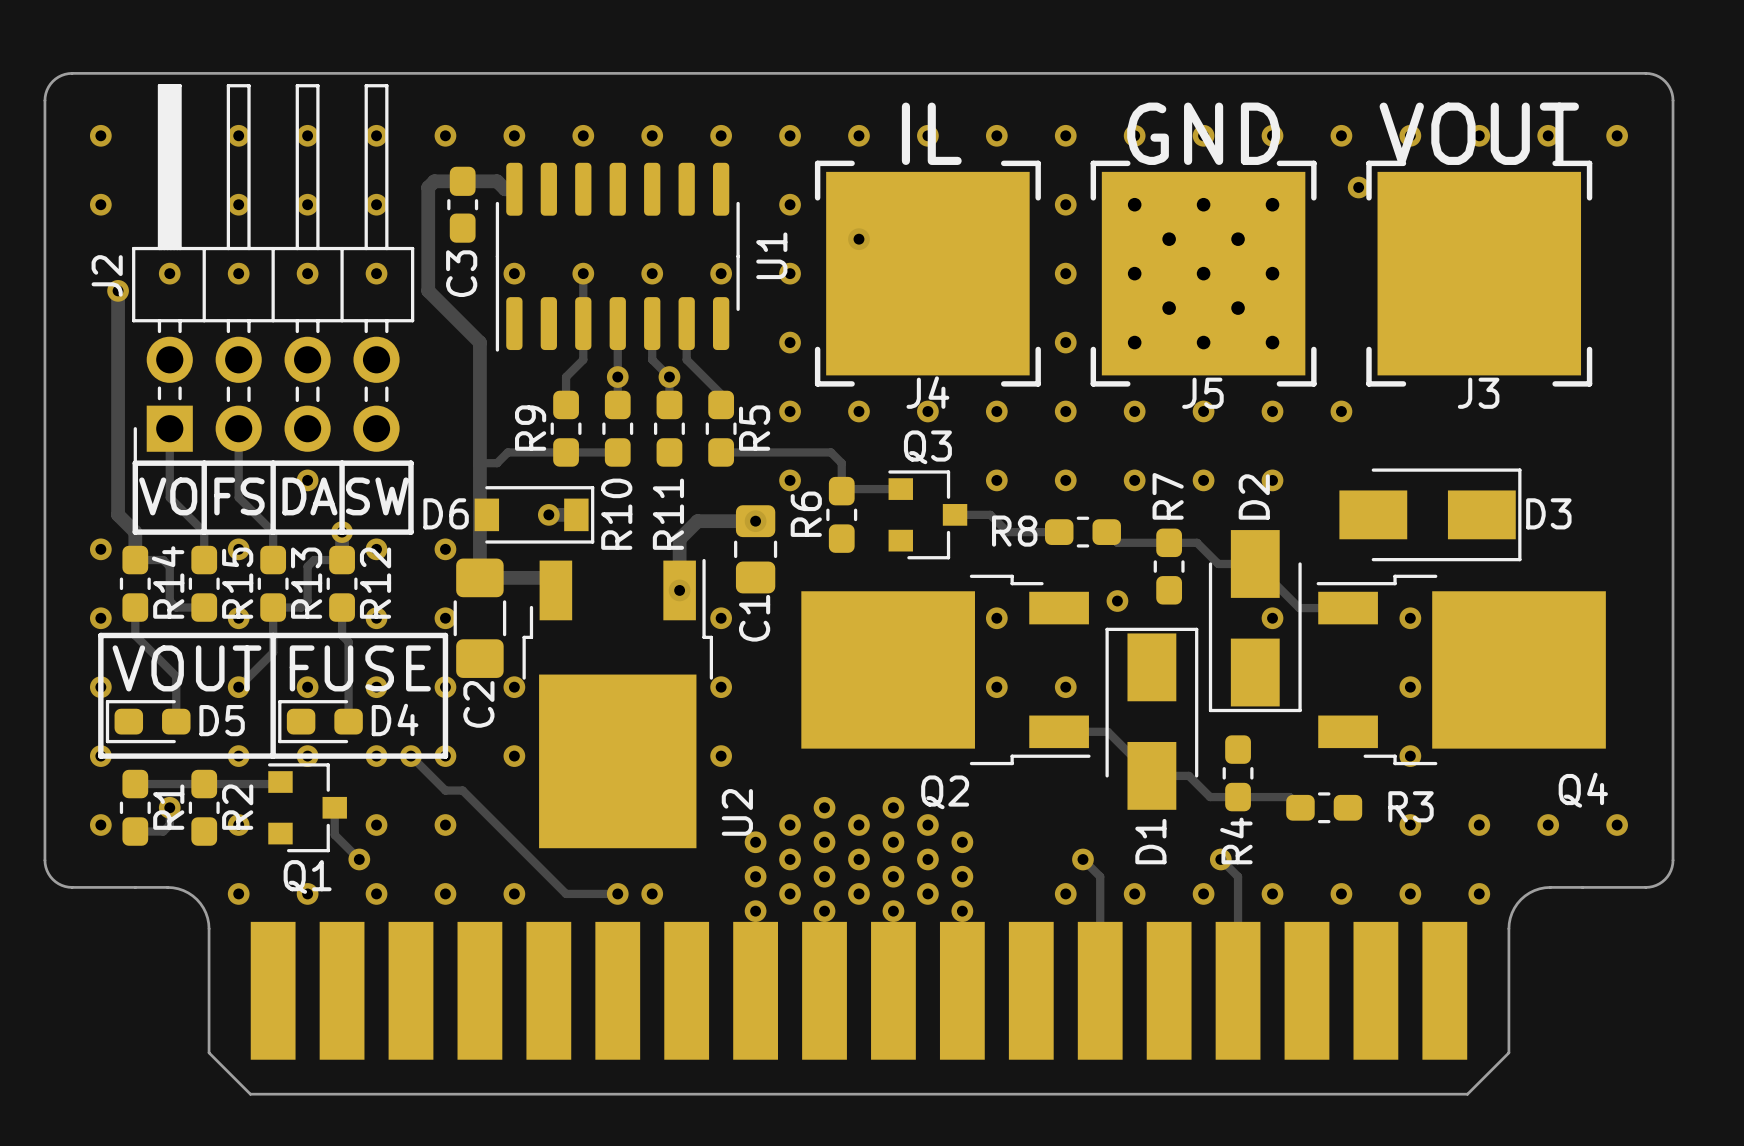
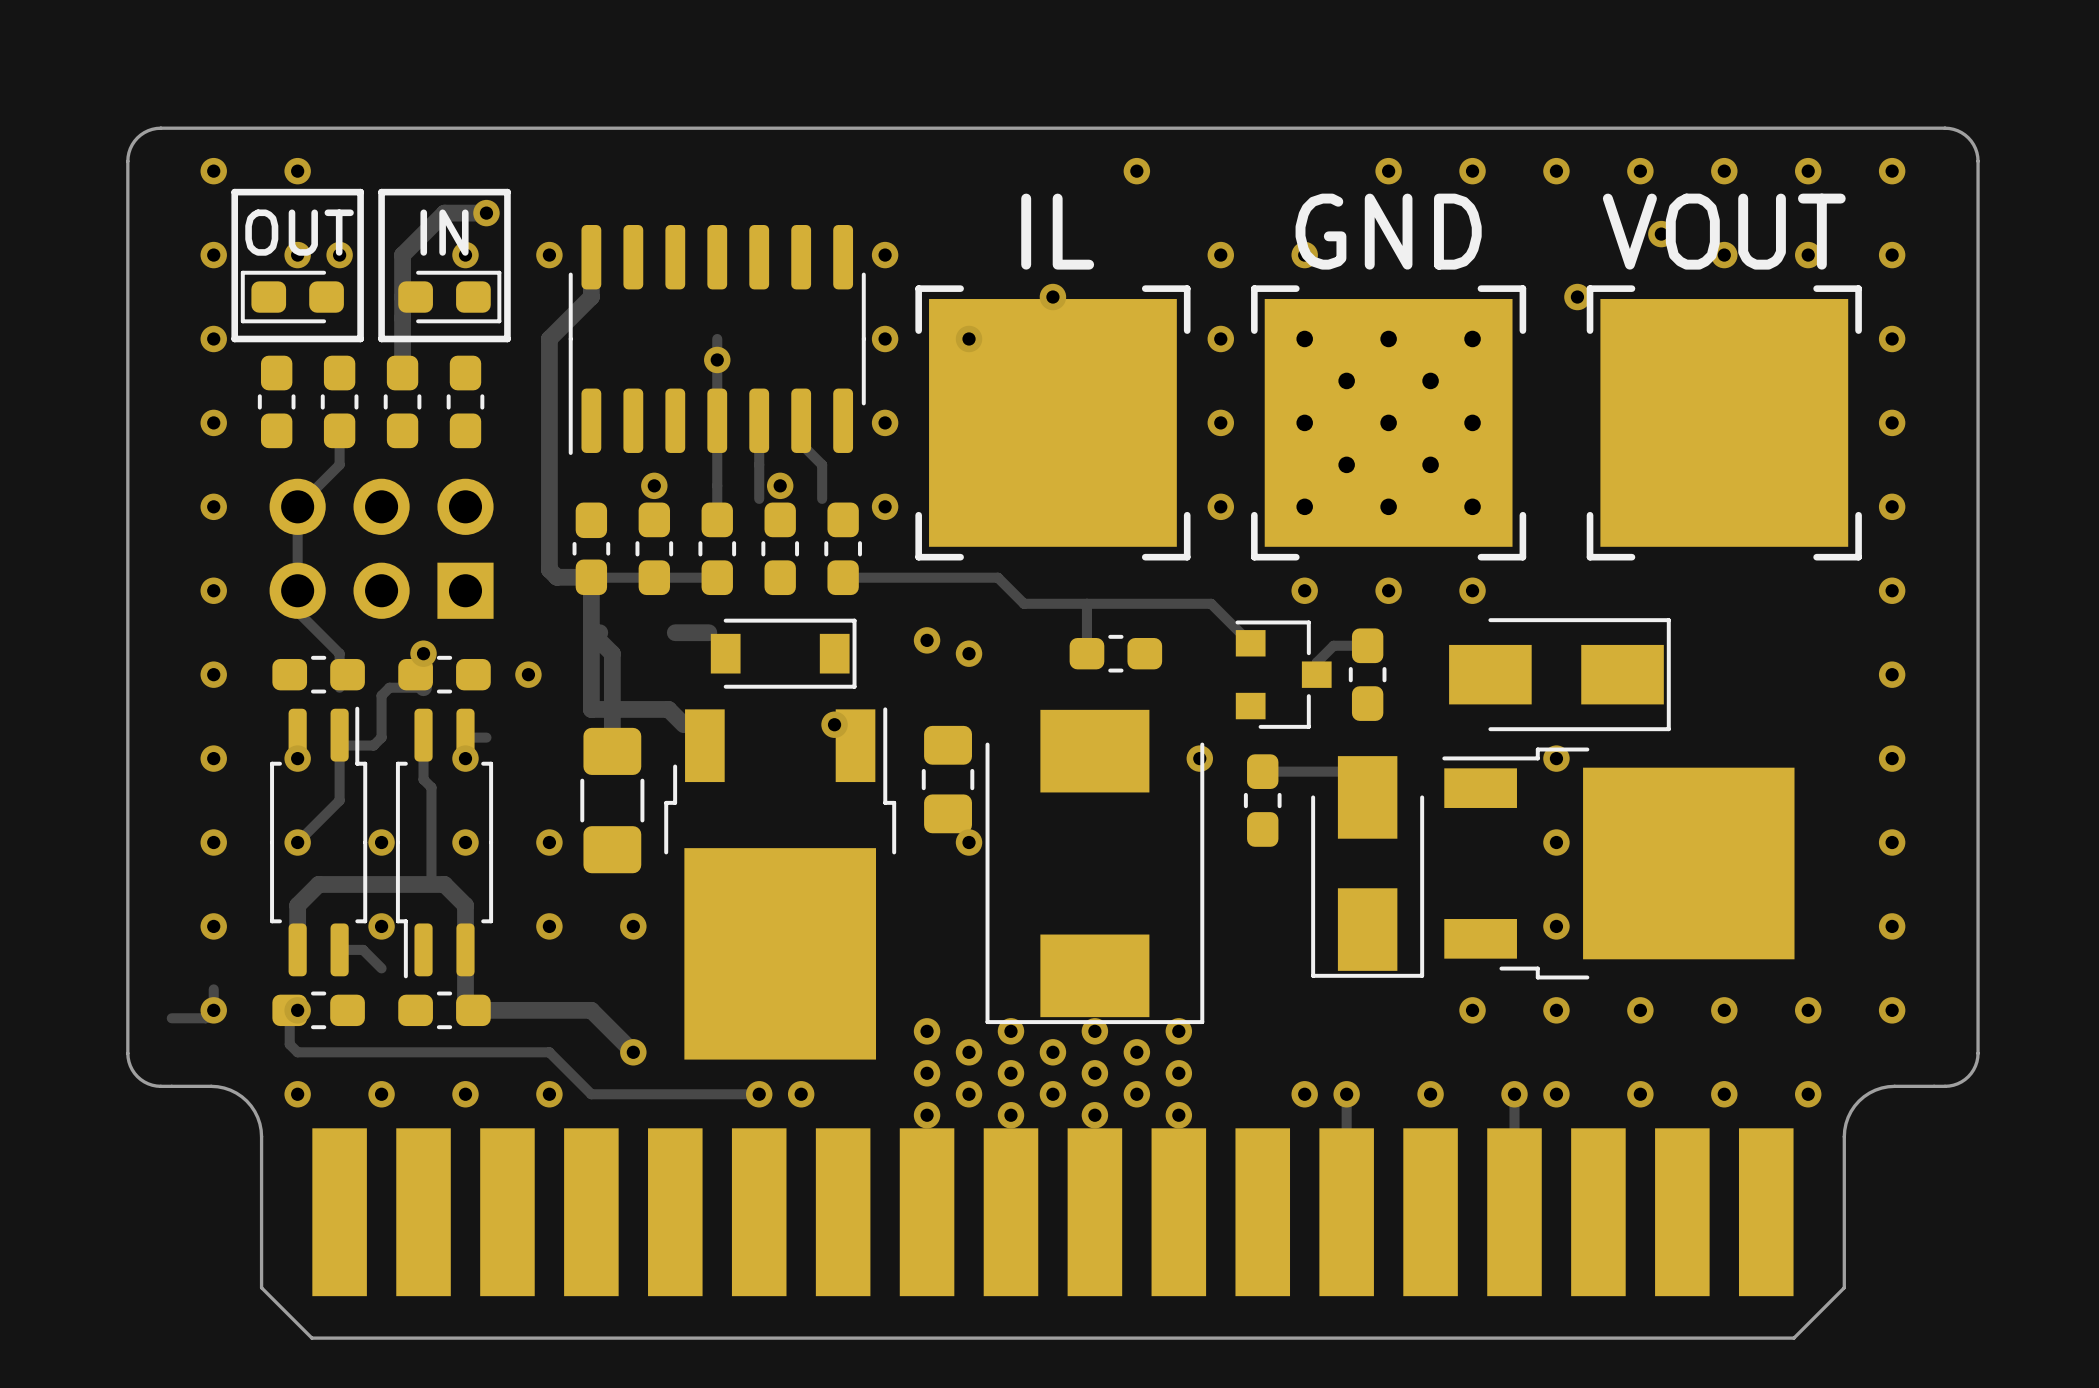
via: (100, 135) -> none
via: (307, 135) -> none
via: (376, 135) -> none
via: (445, 135) -> none
via: (514, 135) -> none
via: (583, 135) -> none
via: (652, 135) -> none
via: (721, 135) -> none
via: (790, 135) -> none
via: (858, 135) -> none
via: (996, 135) -> none
via: (1065, 135) -> none
via: (1617, 135) -> none
line: none -> (234, 192) (360, 192) (360, 338) (234, 338) (234, 192)
line: none -> (381, 192) (381, 338) (507, 338) (507, 192) (381, 192)
track: none -> (486, 213) (444, 213) (402, 255) (402, 373)
via: none -> (486, 213)
text: none -> OUT (299, 232)
text: none -> IN (444, 232)
track: (514, 189) (505, 189) (497, 181) (434, 181) (428, 187) (428, 290) (479, 342) (479, 469) -> (591, 257) (591, 297) (549, 338) (549, 569) (556, 577) (591, 577)
via: (100, 204) -> none
via position: (307, 204) -> (339, 255)
via: none -> (549, 255)
C3: (462, 204) -> none
via: none -> (885, 255)
via: (790, 204) -> none
via: none -> (1220, 255)
via: none -> (1724, 255)
via: none -> (1808, 255)
via: none -> (1892, 255)
part: none -> (292, 297)
part: none -> (449, 297)
via: none -> (1577, 297)
U1: (617, 257) -> none
via: (238, 273) -> none
via: (307, 273) -> none
via: (376, 273) -> none
via: (514, 273) -> none
via position: (583, 273) -> (717, 359)
via: (652, 273) -> none
J4: (927, 273) -> none
via: none -> (1220, 338)
via: (1065, 273) -> none
J5: (1203, 273) -> none
J3: (1479, 273) -> none
via: none -> (1892, 338)
J2: (273, 274) -> none
part: none -> (717, 339)
track: (118, 290) (118, 514) (135, 532) (135, 560) (163, 560) (169, 566) (169, 601) (176, 607) (204, 607) -> none
via: (118, 290) -> none
track: (686, 323) (686, 359) (721, 394) (721, 404) -> none
part: none -> (276, 401)
part: none -> (339, 401)
part: none -> (402, 401)
part: none -> (465, 401)
via: none -> (213, 422)
via: none -> (885, 422)
via: (790, 342) -> none
part: none -> (1052, 422)
via: none -> (1220, 422)
via: (1065, 342) -> none
part: none -> (1388, 422)
part: none -> (1724, 422)
via: none -> (1892, 422)
track: none -> (339, 430) (339, 464) (297, 506)
track: (583, 359) (566, 377) (566, 404) -> (717, 443) (717, 519)
via position: (617, 377) -> (780, 485)
via: (669, 377) -> none
via: none -> (654, 485)
via: none -> (213, 506)
via: none -> (885, 506)
via: (790, 411) -> none
via: (858, 411) -> none
via: (927, 411) -> none
via: (1065, 411) -> none
via: (1134, 411) -> none
via: (1203, 411) -> none
via: (1272, 411) -> none
via: (1341, 411) -> none
via: none -> (1892, 506)
track: (169, 428) (169, 497) (204, 532) (204, 560) -> none
R9: (566, 428) -> none
R10: (617, 428) -> none
R11: (669, 428) -> none
R5: (721, 428) -> none
part: none -> (381, 548)
part: none -> (591, 548)
part: none -> (654, 548)
part: none -> (717, 548)
part: none -> (780, 548)
part: none -> (843, 548)
track: (617, 452) (507, 452) (497, 463) (479, 463) -> none
track: (721, 452) (831, 452) (841, 463) (841, 491) (843, 489) (900, 489) -> none
line: (135, 463) (135, 532) (410, 532) (410, 463) (135, 463) -> none
line: (204, 463) (204, 532) -> none
line: (273, 463) (273, 532) -> none
line: (342, 463) (342, 532) -> none
track: none -> (717, 577) (604, 577) (591, 590)
track: none -> (843, 577) (997, 577) (1024, 603) (1211, 603) (1250, 643)
via: none -> (213, 590)
via: (307, 480) -> none
via: (790, 480) -> none
via: (996, 480) -> none
via: (1272, 480) -> none
via: none -> (1892, 590)
track: none -> (1086, 603) (1086, 653)
text: VO (168, 496) -> none
text: FS (239, 496) -> none
text: DA (309, 496) -> none
text: SW (377, 496) -> none
track: none -> (591, 632) (612, 653) (612, 751)
D6: (534, 514) -> none
via: (548, 514) -> none
R6: (841, 514) -> none
Q3: (927, 514) -> none
track: (955, 514) (990, 514) (1007, 532) (1059, 532) -> none
D3: (1430, 514) -> none
track: (755, 521) (697, 521) (679, 539) (679, 590) -> none
track: none -> (1367, 645) (1333, 645) (1316, 662) (1316, 674)
part: none -> (783, 653)
via: none -> (969, 653)
part: none -> (1115, 653)
R8: (1082, 532) -> none
track: (1106, 532) (1117, 542) (1197, 542) (1218, 563) (1255, 563) (1299, 608) (1348, 608) -> none
via: (100, 549) -> none
via: none -> (213, 674)
via: (238, 549) -> none
part: none -> (318, 674)
part: none -> (444, 674)
via: (376, 549) -> none
via position: (445, 549) -> (528, 674)
C1: (755, 549) -> none
part: none -> (1283, 674)
part: none -> (1367, 674)
part: none -> (1559, 674)
via: none -> (1892, 674)
R7: (1169, 566) -> none
R14: (135, 583) -> none
R15: (204, 583) -> none
R13: (273, 583) -> none
R12: (342, 583) -> none
track: none -> (465, 735) (467, 737) (486, 737)
via: (1117, 601) -> none
track: (135, 607) (135, 635) (176, 676) (176, 721) -> none
via: (100, 618) -> none
via: none -> (213, 758)
via: (445, 618) -> none
C2: (479, 618) -> none
via: (721, 618) -> none
via position: (996, 618) -> (1199, 758)
via: (1410, 618) -> none
via: none -> (1892, 758)
D2: (1255, 621) -> none
track: none -> (1262, 771) (1341, 771) (1367, 797)
line: (100, 635) (100, 756) (445, 756) (445, 635) (100, 635) -> none
line: (273, 635) (273, 756) -> none
part: none -> (948, 779)
part: none -> (612, 800)
part: none -> (1262, 800)
text: VOUT (187, 668) -> none
text: FUSE (360, 668) -> none
Q2: (945, 669) -> none
Q4: (1461, 669) -> none
part: none -> (318, 841)
via: (100, 687) -> none
via: none -> (213, 842)
part: none -> (444, 843)
via: (514, 687) -> none
via: (721, 687) -> none
via: none -> (969, 842)
via: (996, 687) -> none
via: (1065, 687) -> none
via: none -> (1556, 842)
via: (1410, 687) -> none
via: none -> (1892, 842)
U2 position: (617, 703) -> (780, 883)
part: none -> (1618, 863)
part: none -> (1094, 866)
part: none -> (1367, 866)
D1: (1151, 718) -> none
D5: (148, 721) -> none
D4: (320, 721) -> none
track: (1059, 731) (1107, 731) (1151, 775) (1188, 775) (1210, 797) (1289, 797) (1300, 807) -> none
via: (100, 756) -> none
via: none -> (213, 926)
via: (238, 756) -> none
via: (376, 756) -> none
track: (410, 756) (445, 790) (462, 790) (566, 893) -> (289, 1010) (289, 1044) (297, 1052) (549, 1052) (591, 1094) (696, 1094)
via: (410, 756) -> none
via: (721, 756) -> none
via: none -> (1556, 926)
via: (1410, 756) -> none
via: none -> (1892, 926)
R4: (1238, 773) -> none
track: none -> (297, 949) (297, 905) (318, 884) (444, 884) (465, 905) (465, 1002) (473, 1010) (591, 1010) (633, 1052)
track: none -> (339, 949) (363, 949) (381, 968)
track: (280, 782) (278, 784) (135, 784) -> none
R1: (135, 807) -> none
via position: (169, 807) -> (213, 1010)
R2: (204, 807) -> none
Q1: (307, 807) -> none
track: (334, 807) (334, 834) (359, 859) -> none
via: (824, 807) -> none
via: (893, 807) -> none
R3: (1324, 807) -> none
U2 name: U2 (737, 812) -> none
via: (100, 825) -> none
part: none -> (318, 1010)
part: none -> (444, 1010)
via: (376, 825) -> none
via: (445, 825) -> none
via: (790, 825) -> none
via: (858, 825) -> none
via: (927, 825) -> none
via: none -> (1472, 1010)
via: none -> (1556, 1010)
via: none -> (1640, 1010)
via: (1617, 825) -> none
via: (359, 859) -> none
track: (1082, 859) (1100, 876) (1100, 893) -> none
via: (1082, 859) -> none
track: (1220, 859) (1238, 876) (1238, 893) -> none
via: (1220, 859) -> none
board edge: (126, 887) (65, 886) (52, 879) (45, 863) (44, 100) (47, 90) (52, 81) (68, 73) (1645, 73) (1659, 77) (1669, 86) (1673, 100) (1672, 863) (1667, 876) (1652, 886) (1591, 887) -> (160, 1086) (148, 1083) (137, 1076) (130, 1065) (127, 1053) (127, 161) (130, 148) (137, 137) (148, 130) (160, 128) (1945, 128) (1961, 132) (1973, 144) (1978, 161) (1978, 1053) (1975, 1065) (1968, 1076) (1957, 1083) (1945, 1086)
via position: (514, 893) -> (633, 1052)
via: none -> (1346, 1094)
via: (1134, 893) -> none
via: none -> (1430, 1094)
via: (1203, 893) -> none
via: none -> (1514, 1094)

